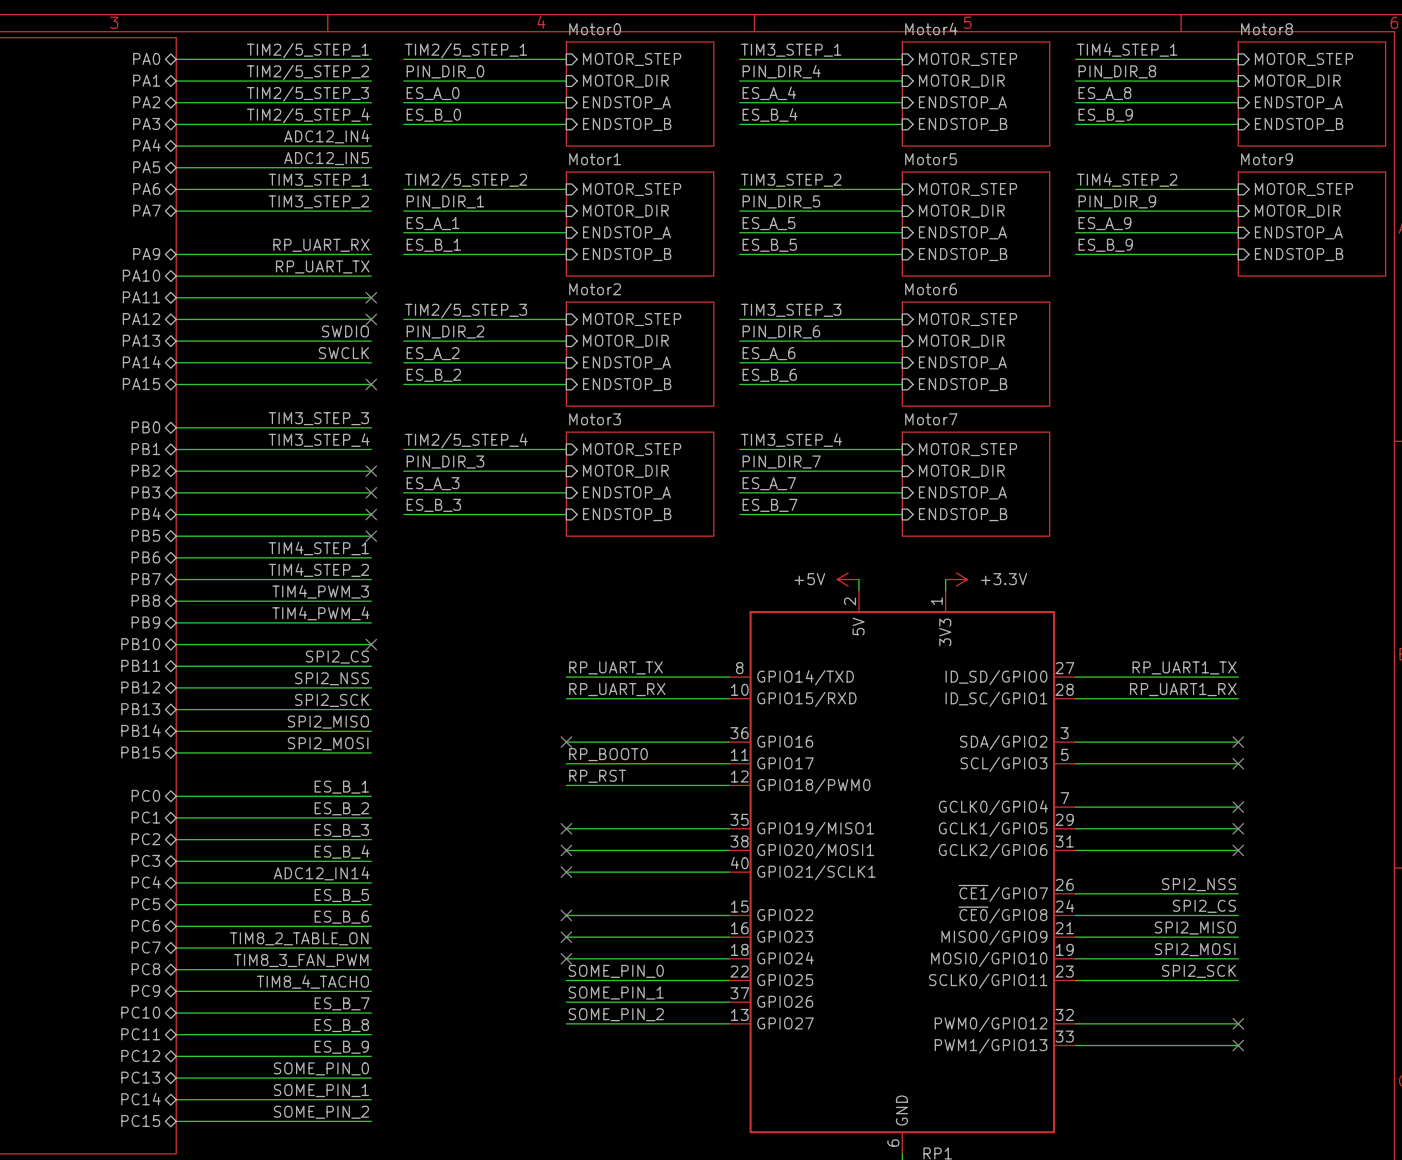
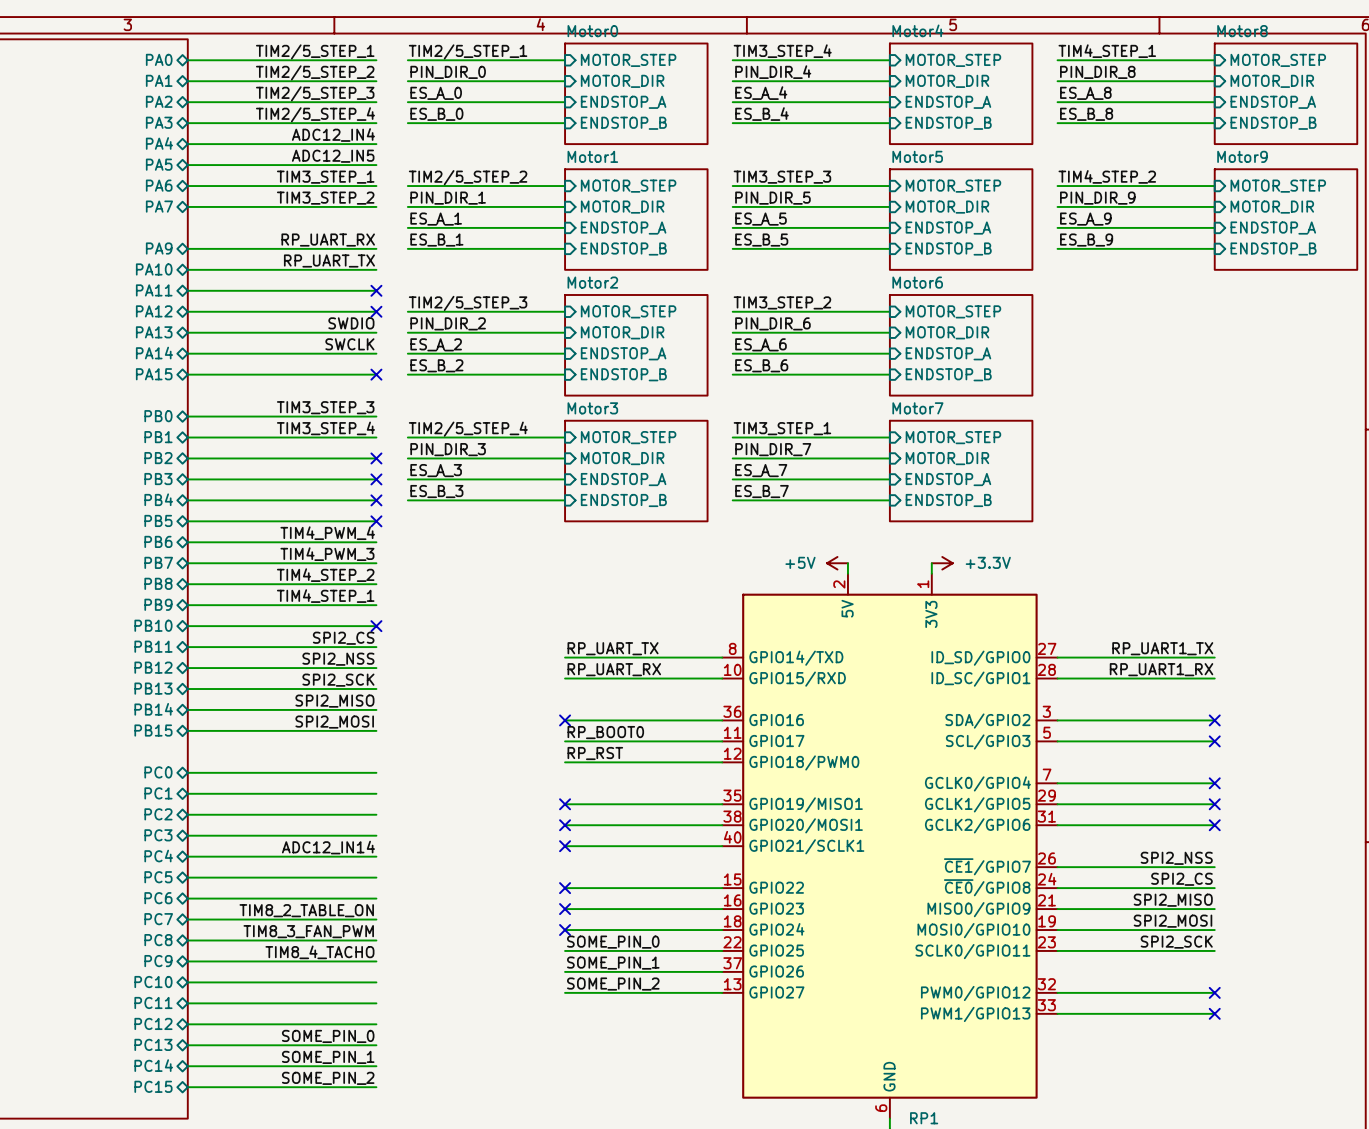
label: TIM3_STEP_1 (791, 50) -> TIM3_STEP_4 (782, 51)
label: ES_B_9 (1105, 115) -> ES_B_8 (1086, 114)
label: TIM3_STEP_2 (791, 180) -> TIM3_STEP_3 (782, 177)
label: TIM3_STEP_3 (791, 310) -> TIM3_STEP_2 (782, 302)
label: TIM3_STEP_4 (791, 440) -> TIM3_STEP_1 (782, 428)
label: TIM4_STEP_1 (318, 548) -> TIM4_PWM_4 (327, 533)
label: TIM4_STEP_2 (318, 570) -> TIM4_PWM_3 (327, 554)
label: TIM4_PWM_3 (320, 591) -> TIM4_STEP_2 (325, 575)
label: TIM4_PWM_4 (320, 613) -> TIM4_STEP_1 (325, 596)
label: ES_B_1 (341, 787) -> none
label: ES_B_2 (341, 808) -> none
label: ES_B_3 (341, 830) -> none
label: ES_B_4 (342, 851) -> none
label: ES_B_5 (341, 895) -> none
label: ES_B_6 (341, 917) -> none
label: ES_B_7 (342, 1003) -> none
label: ES_B_8 (341, 1025) -> none
label: ES_B_9 (341, 1047) -> none

